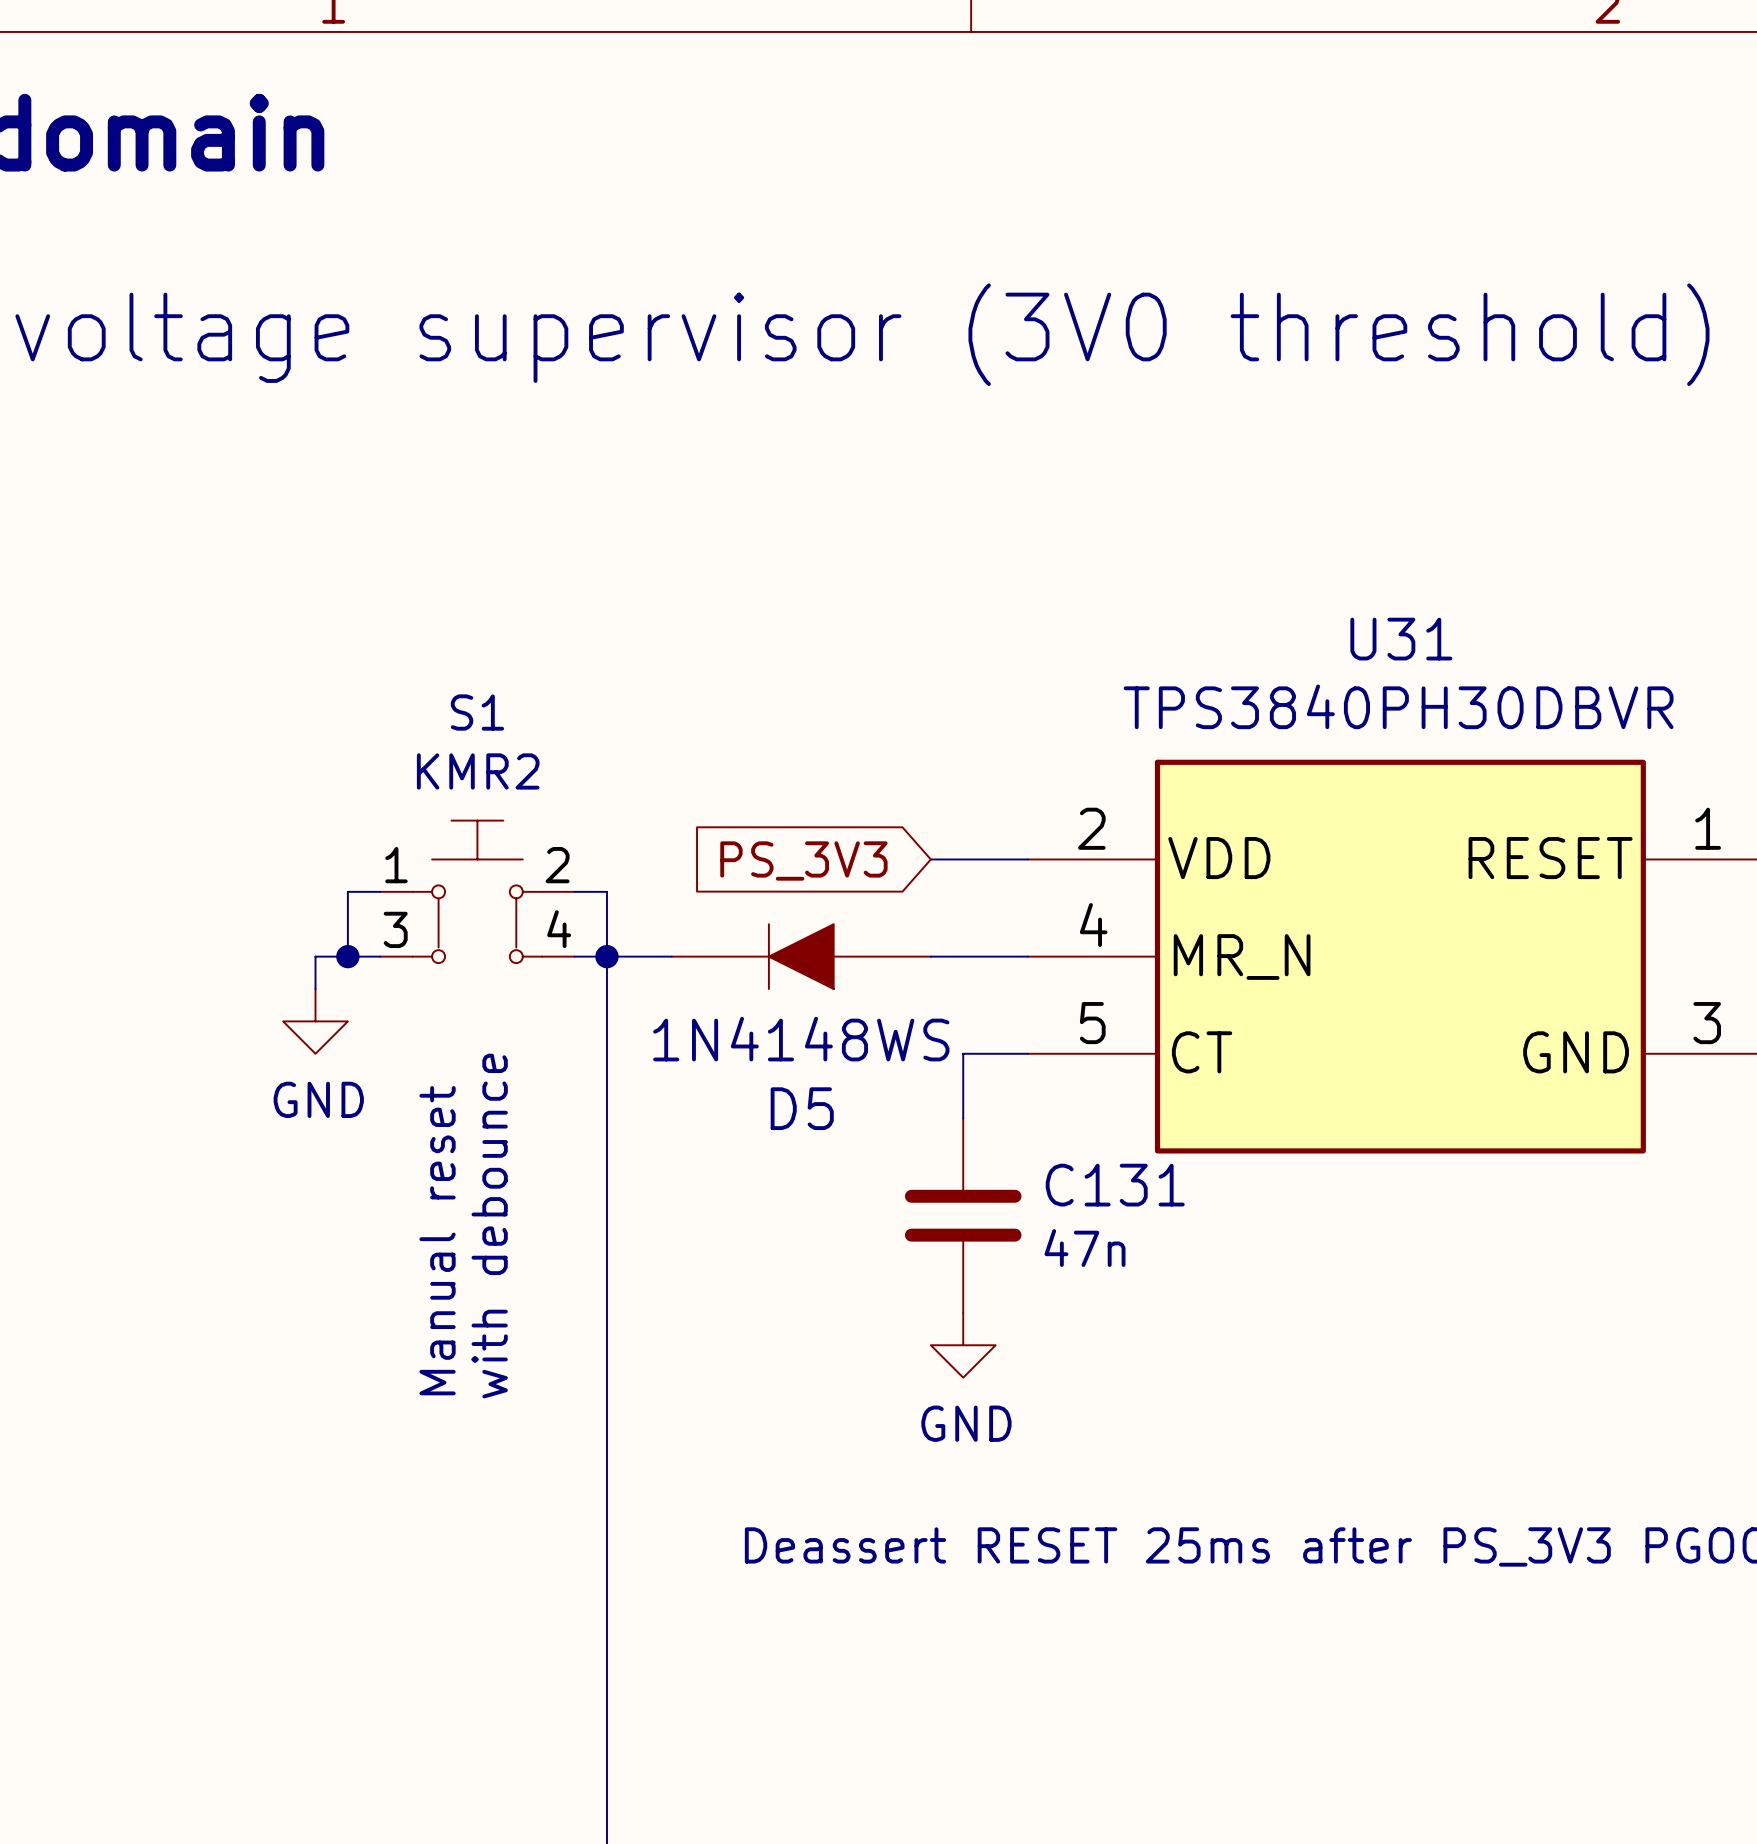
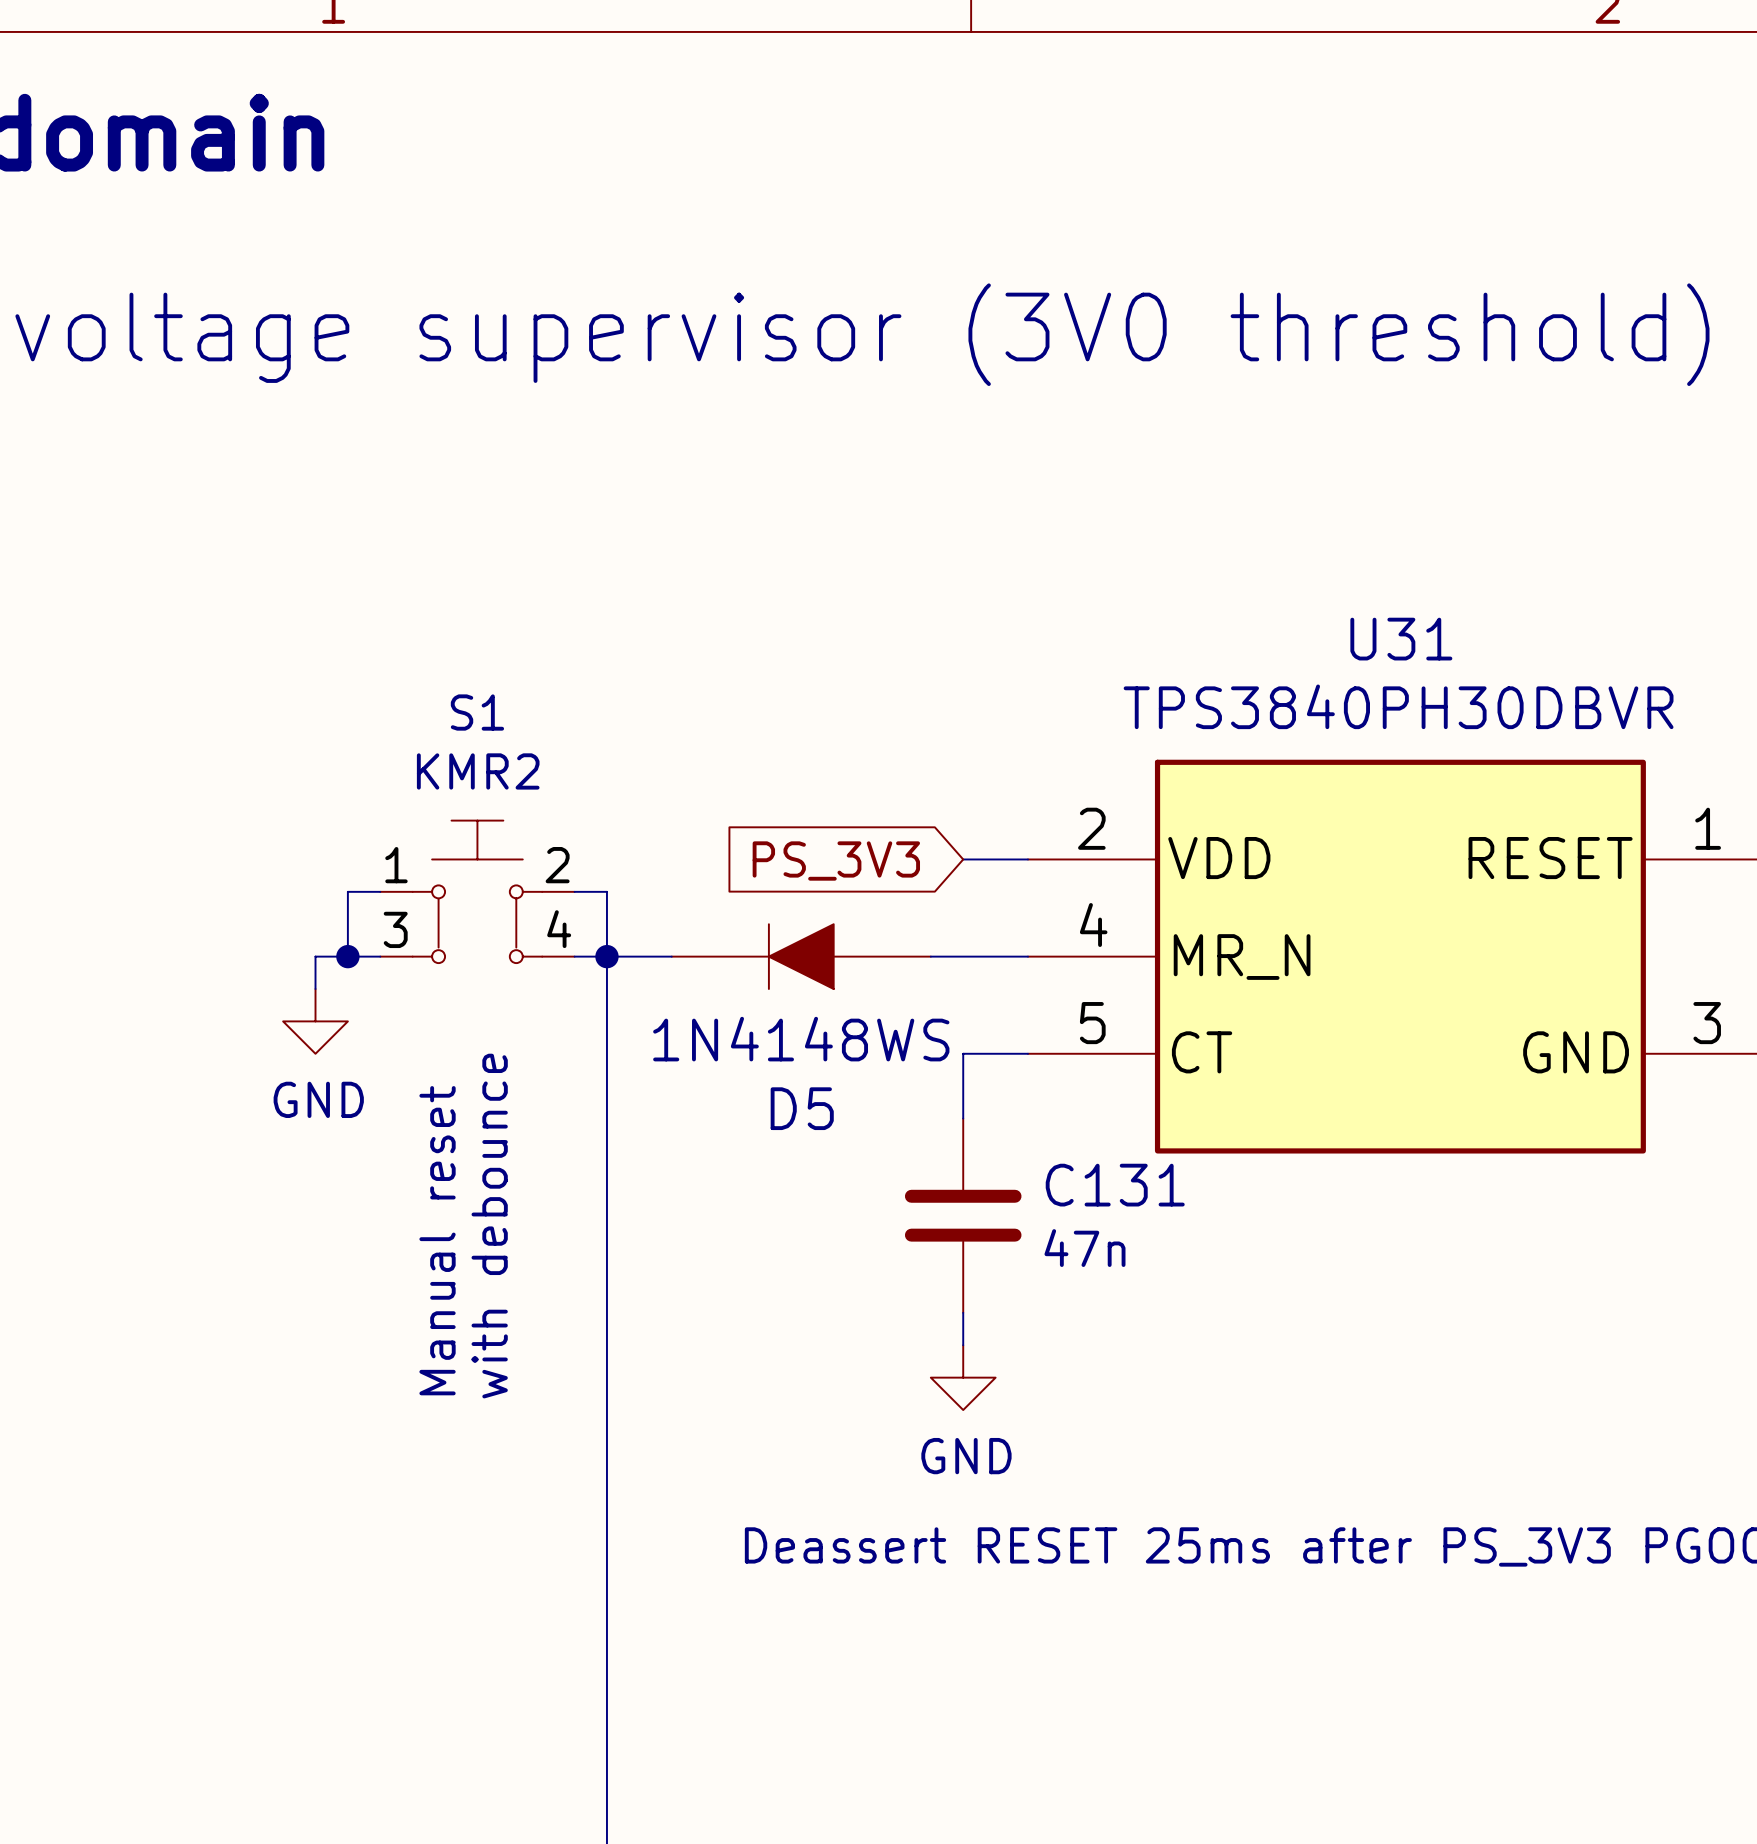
wire: (930, 859) (963, 859) -> none
global label position: PS_3V3 (803, 861) -> PS_3V3 (836, 861)
power symbol position: GND (963, 1345) -> GND (963, 1377)

